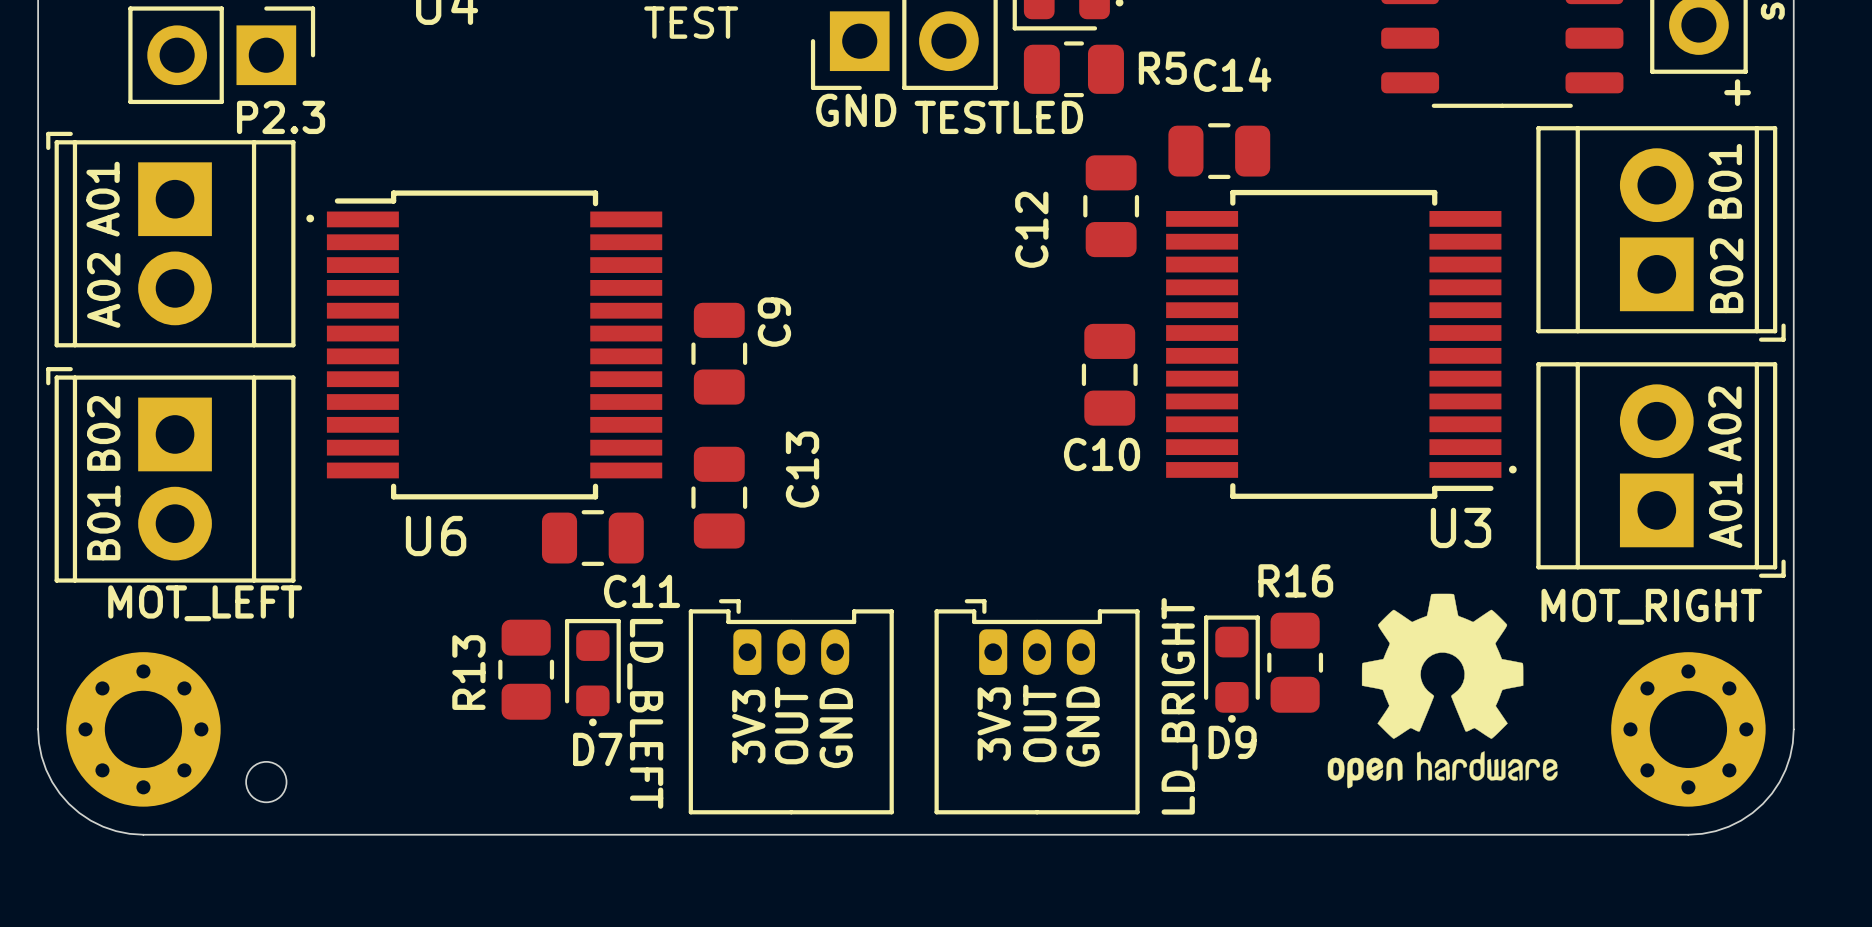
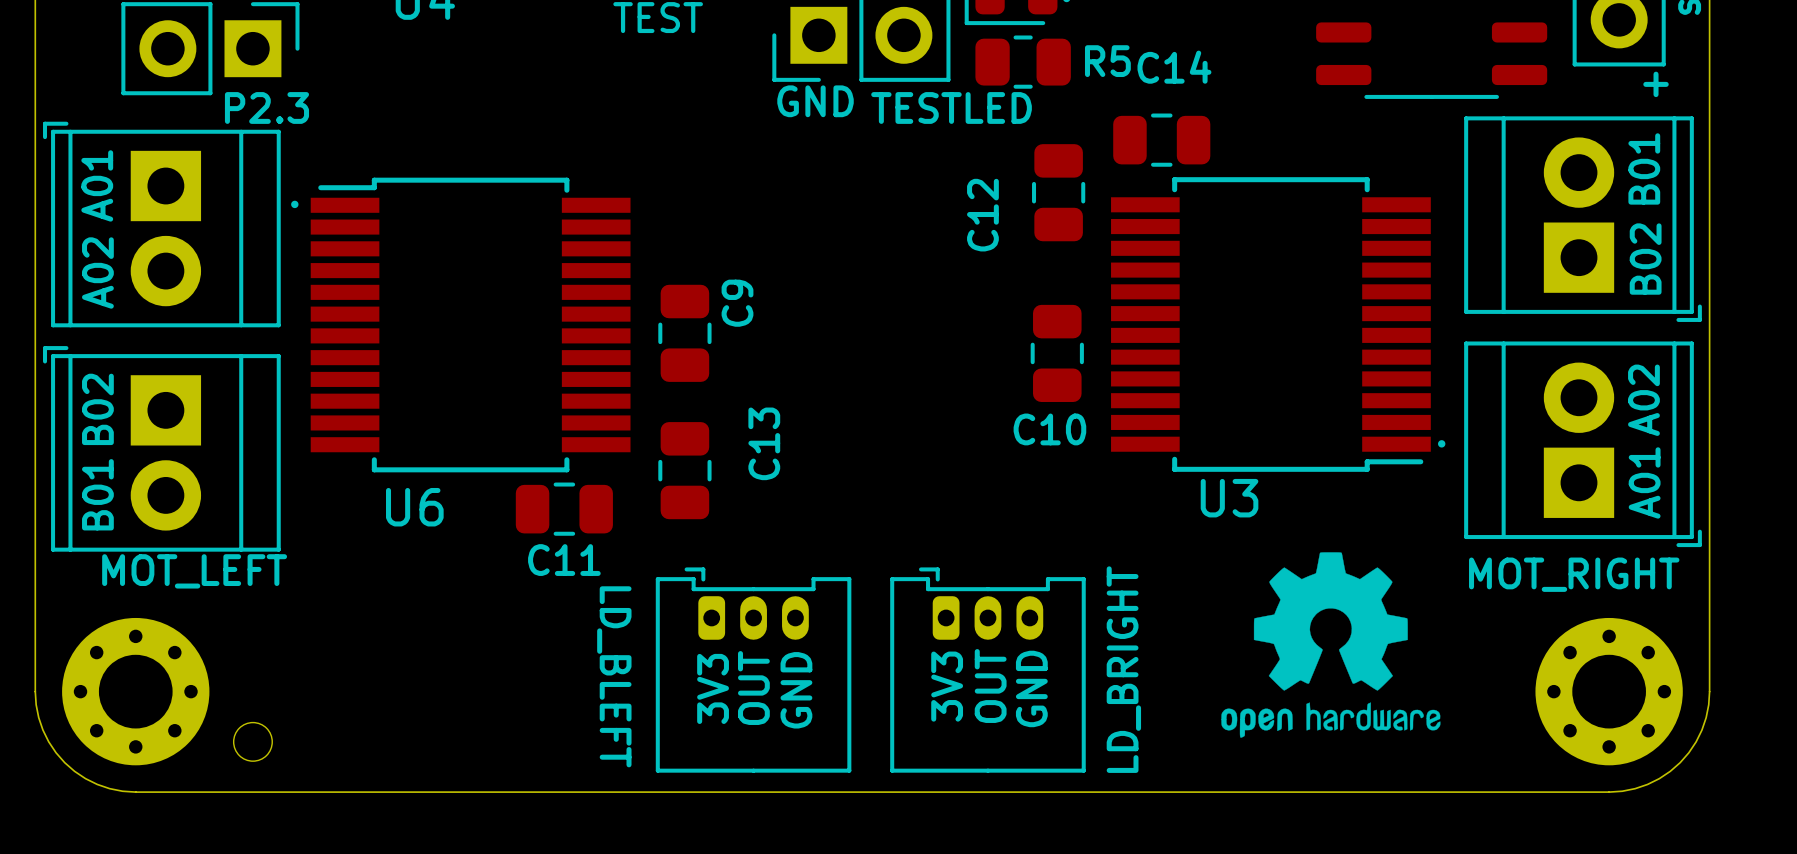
U3 name position: U3 (1461, 527) -> U3 (1229, 498)
C11 name position: C11 (642, 591) -> C11 (564, 560)
R16: (1295, 662) -> none
D9: (1231, 664) -> none
D7: (592, 667) -> none
R13: (526, 669) -> none
drawing position: (1442, 691) -> (1330, 644)
drawing: [1228, 715, 1236, 723] -> none
drawing: [589, 718, 597, 727] -> none

